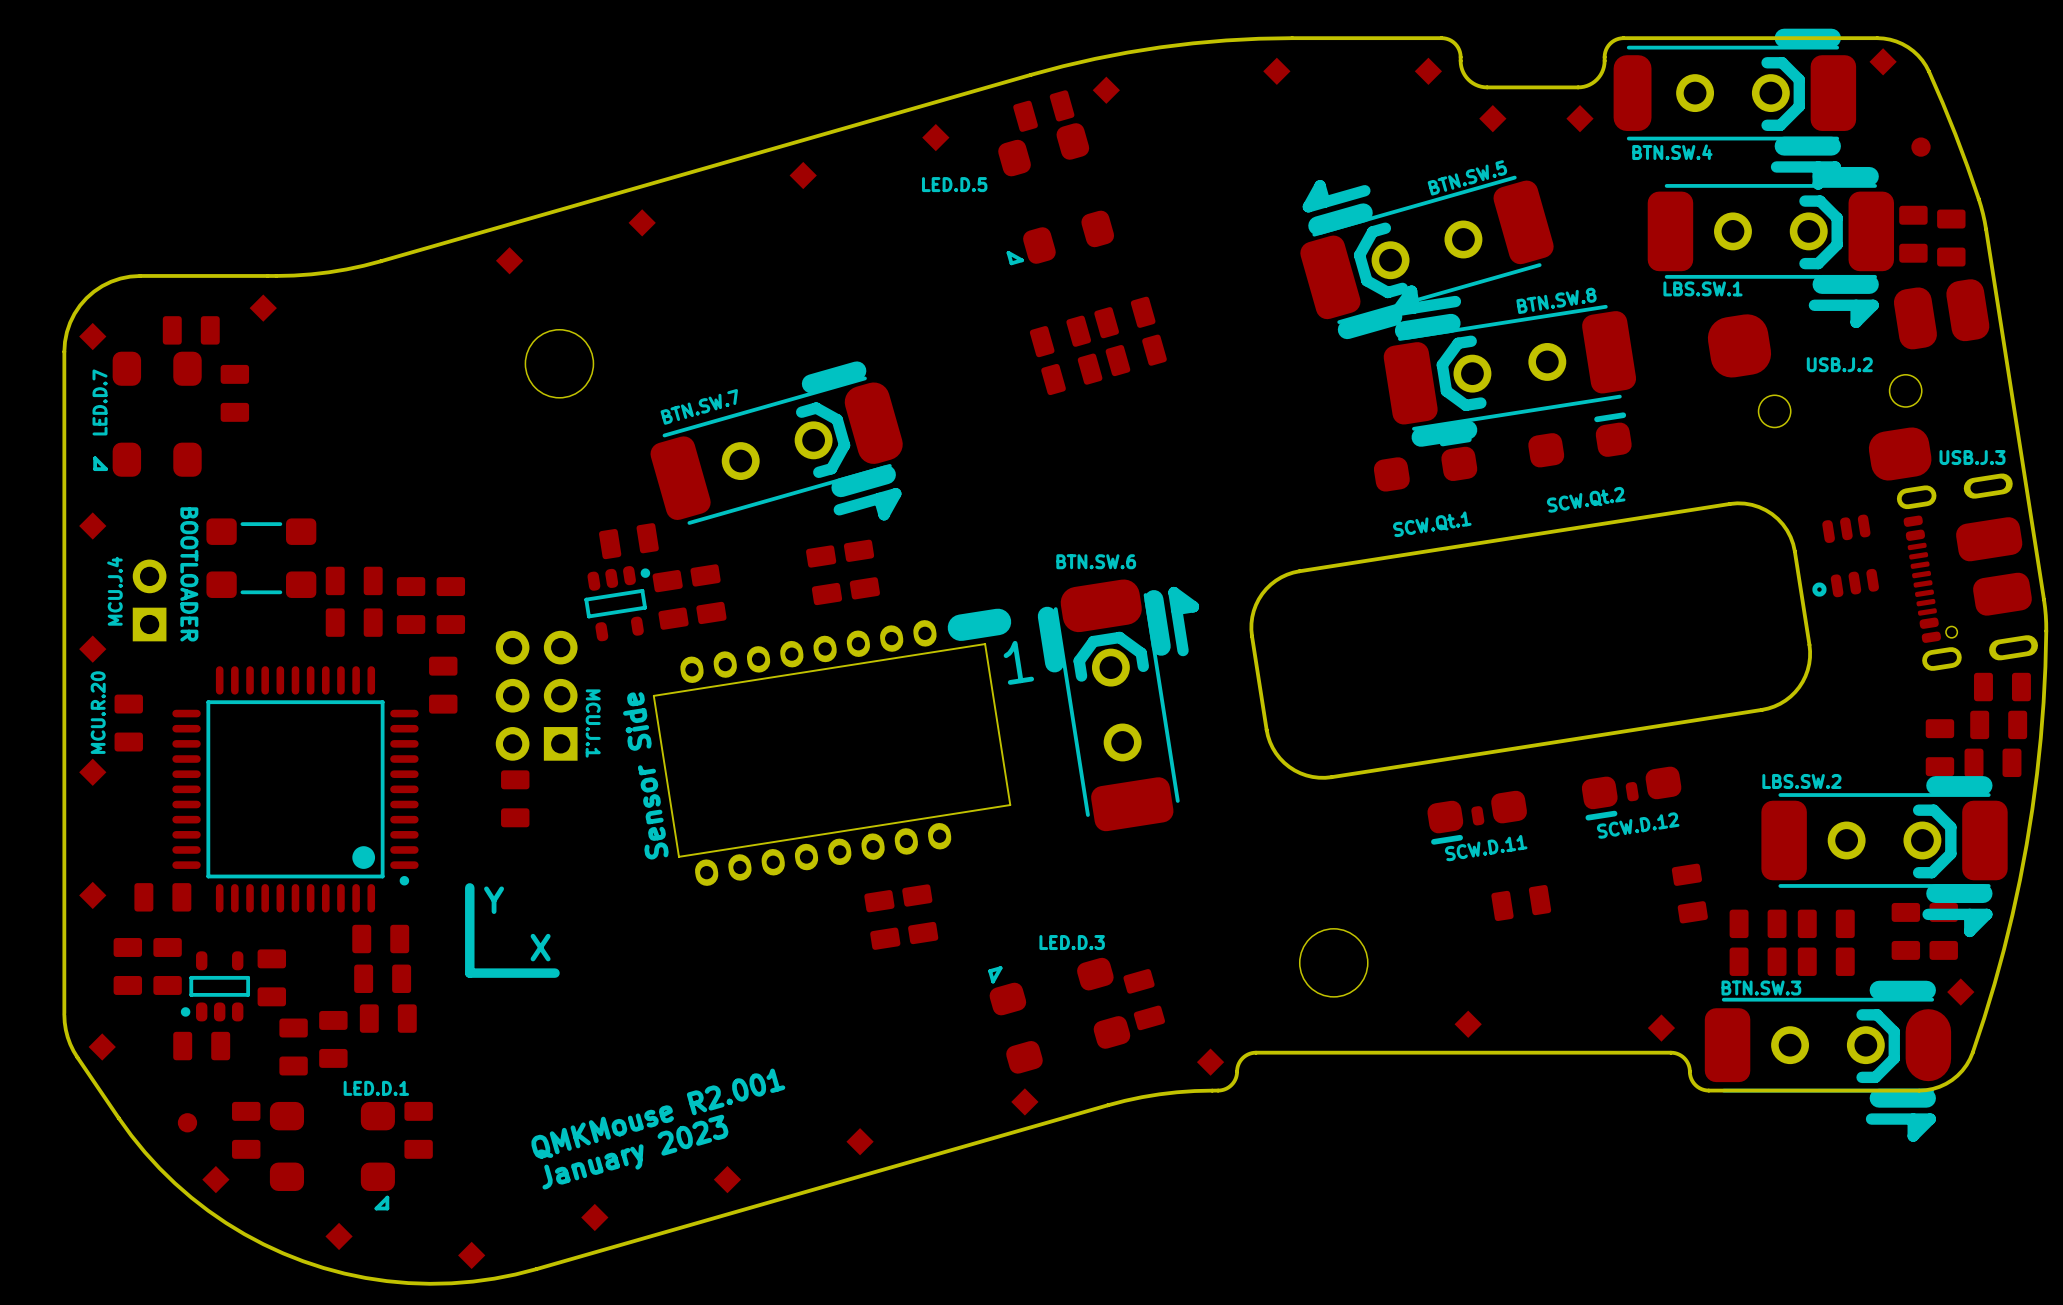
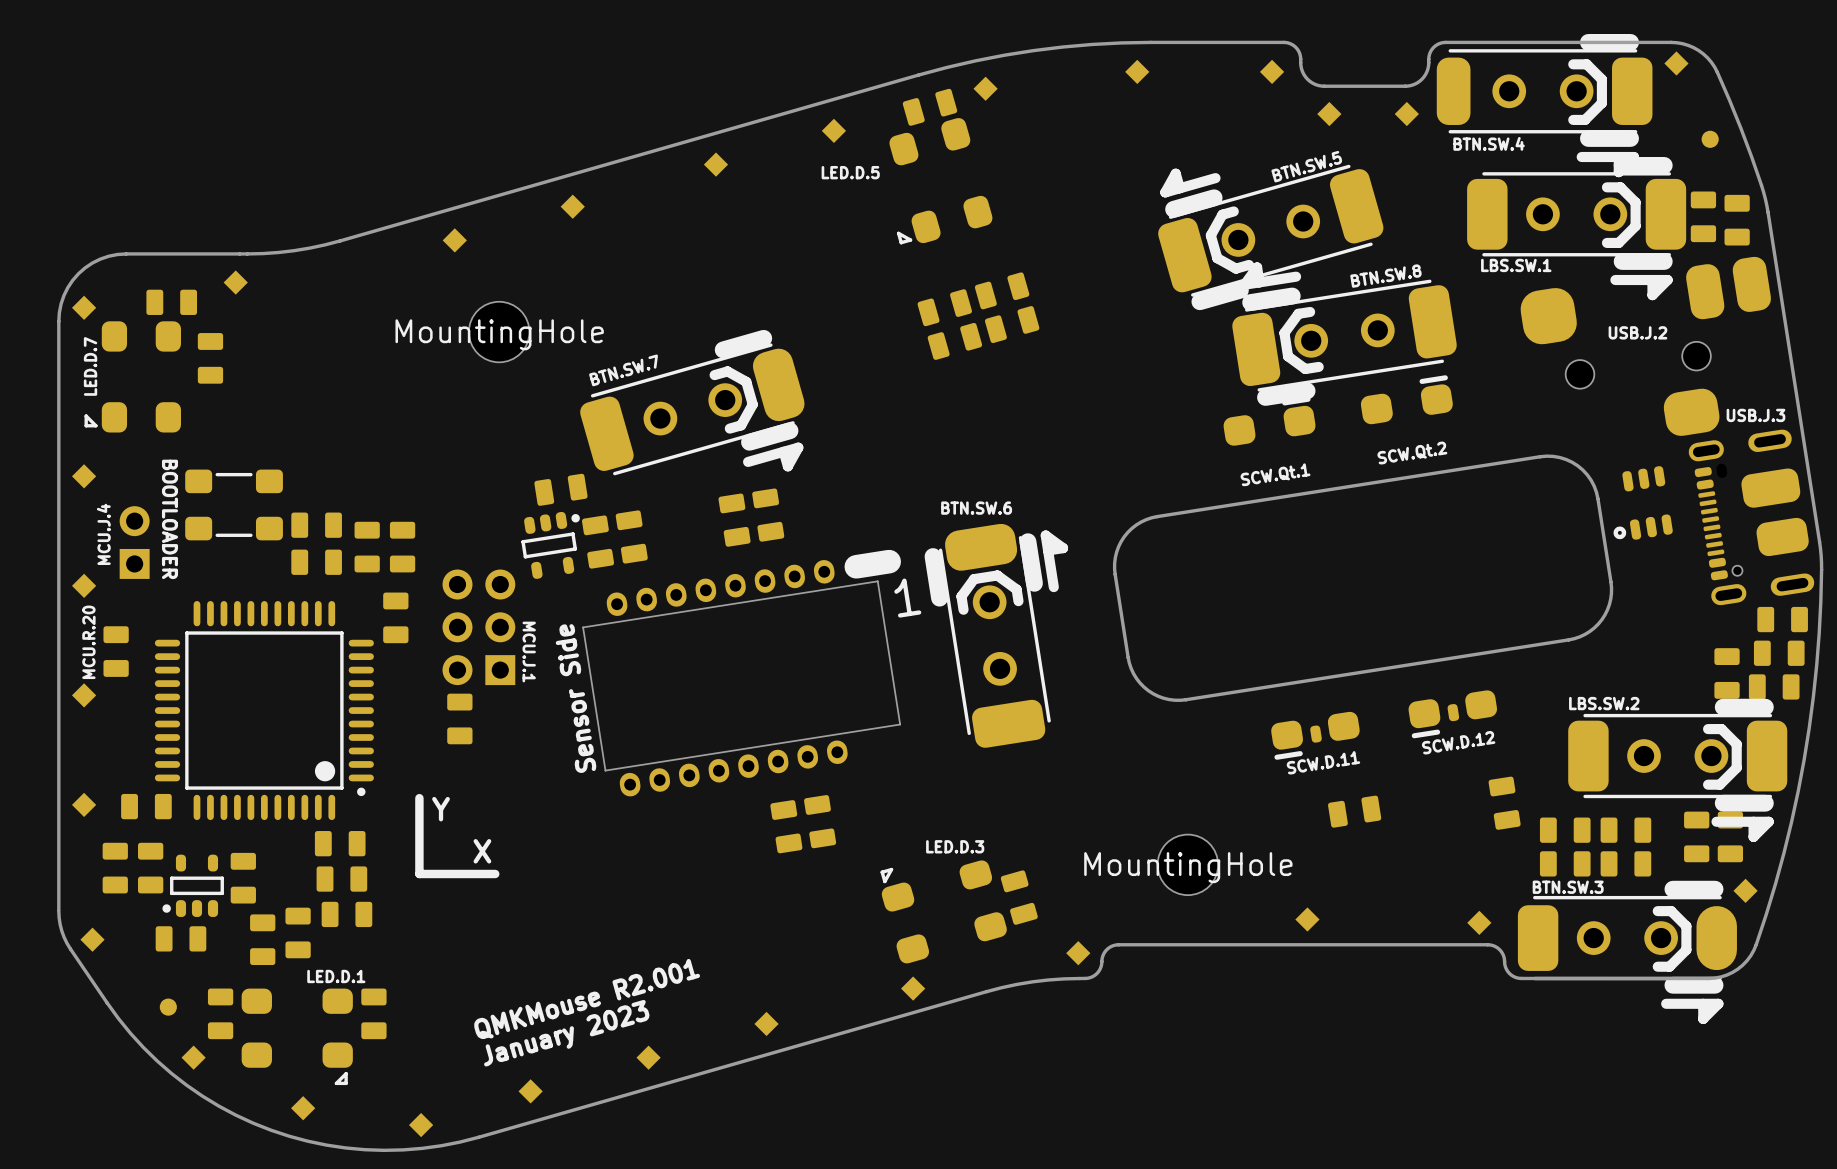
part value: none -> MountingHole (499, 334)
part value: none -> MountingHole (1188, 867)

